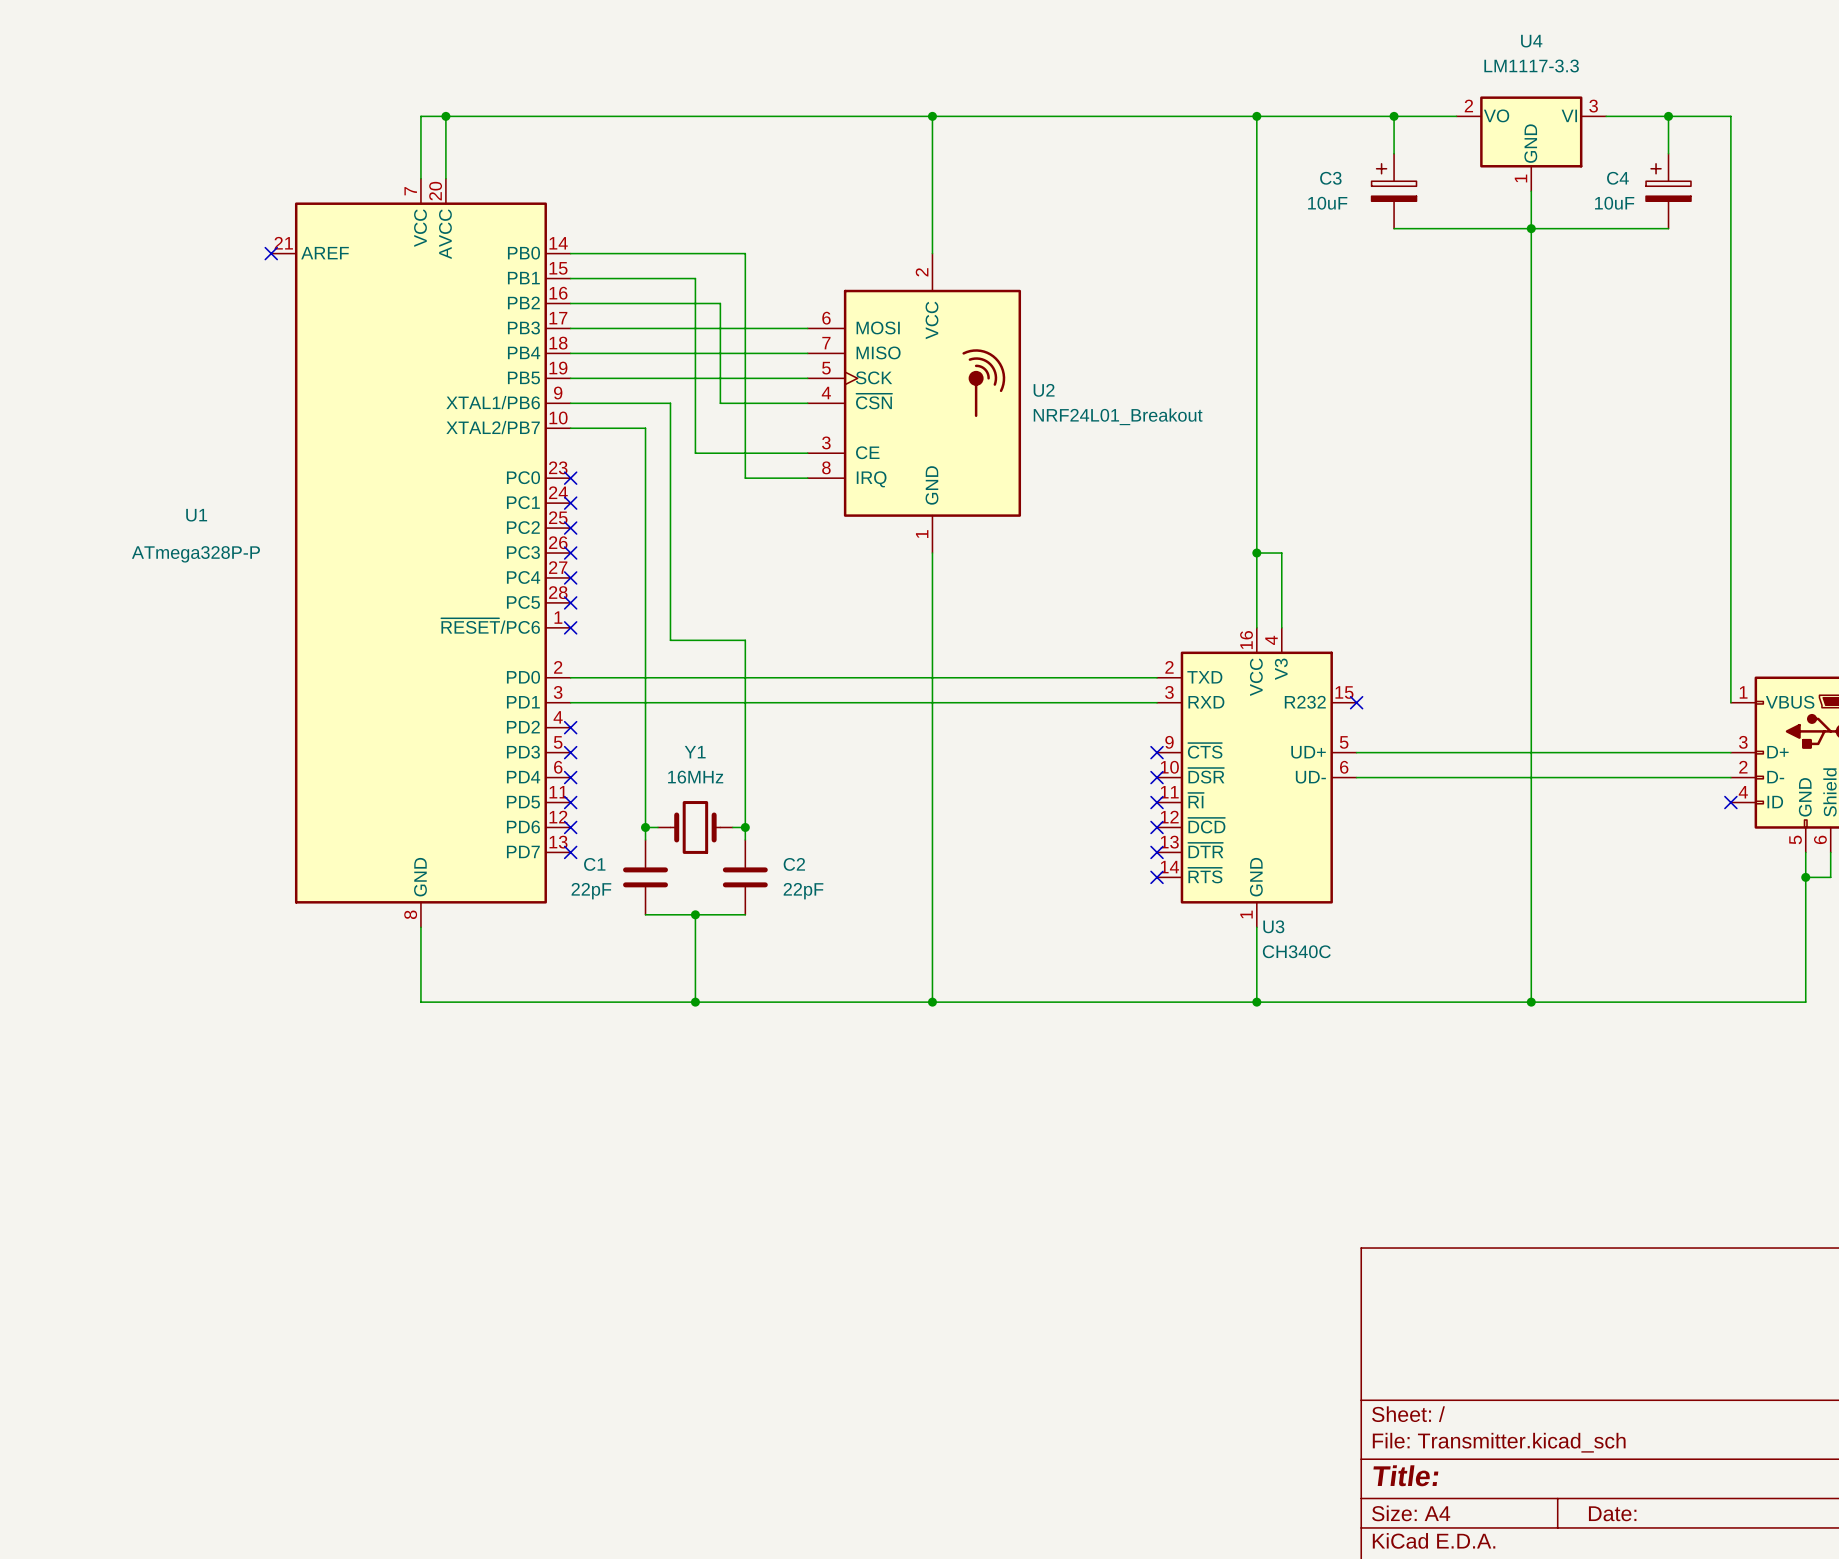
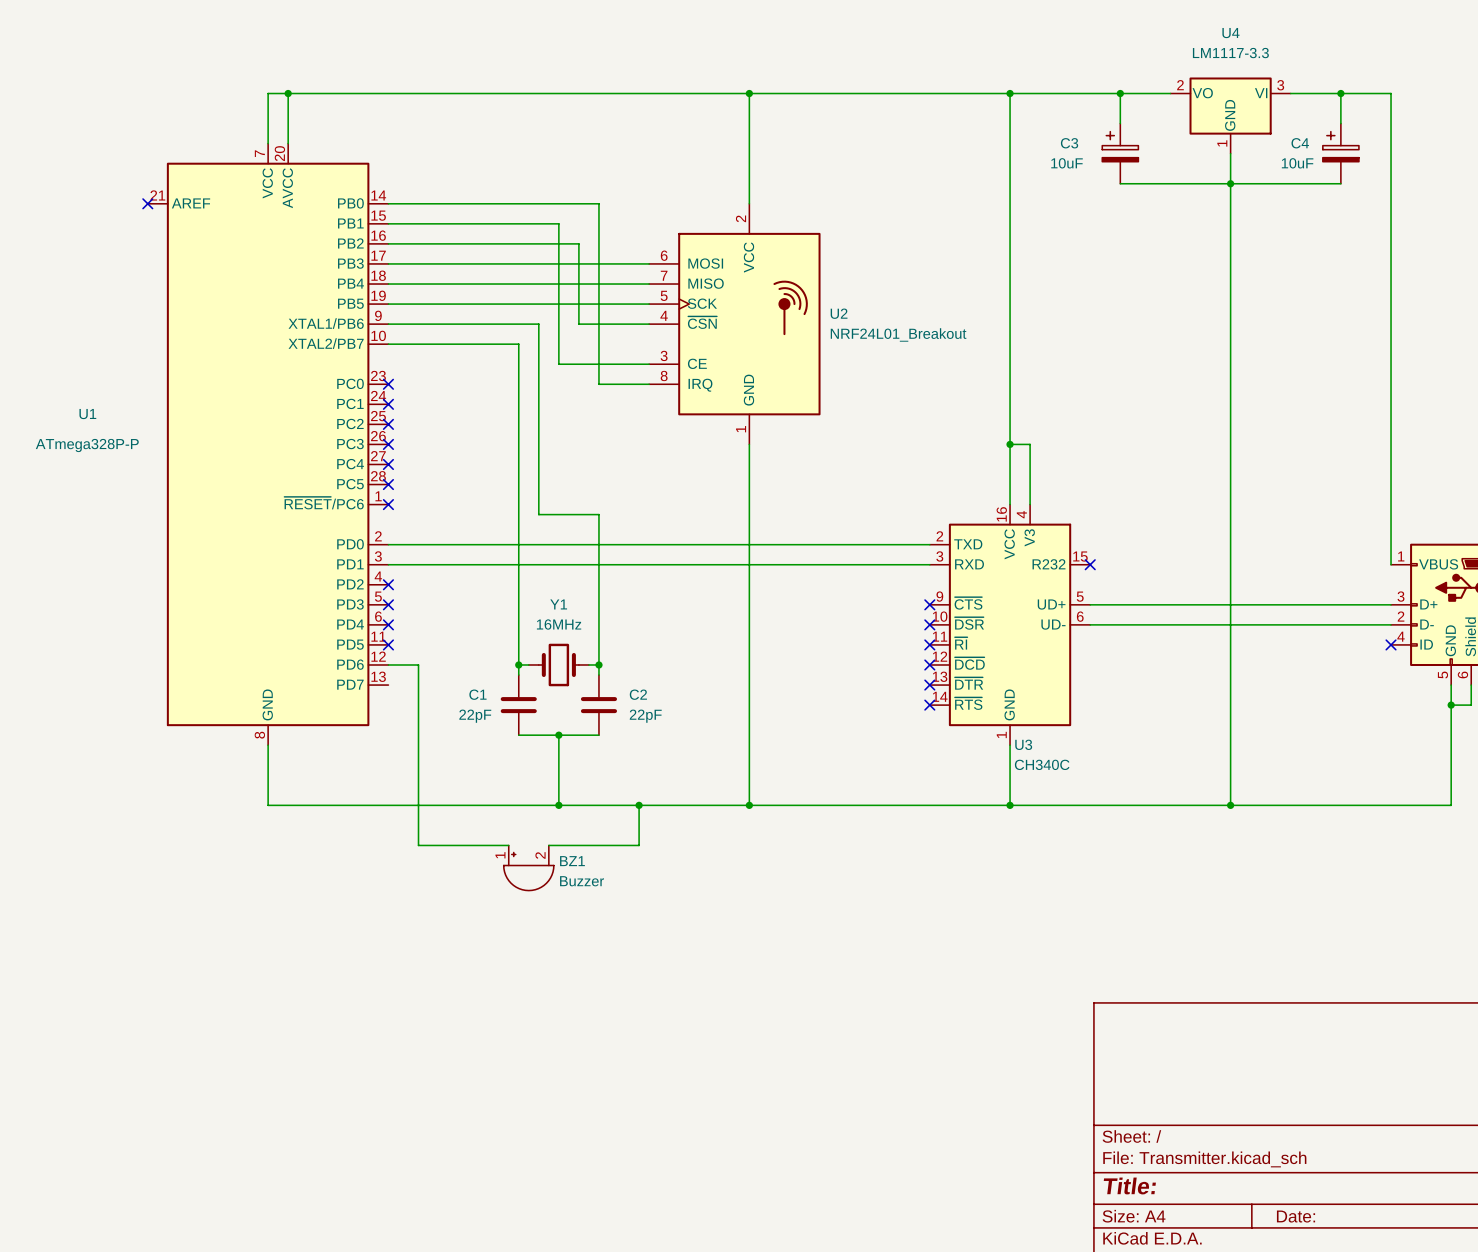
junction: none -> (288, 93)
wire: (420, 116) (420, 178) -> (338, 93) (268, 93) (268, 143)
wire: (445, 116) (445, 178) -> (288, 93) (288, 143)
junction: (445, 116) -> none
no-connect mark: none -> (147, 203)
no-connect mark: (271, 253) -> none
no-connect mark: none -> (388, 384)
no-connect mark: (570, 478) -> none
no-connect mark: none -> (388, 404)
no-connect mark: (570, 503) -> none
no-connect mark: none -> (388, 424)
no-connect mark: (570, 528) -> none
U1 position: (420, 553) -> (268, 444)
no-connect mark: none -> (388, 444)
no-connect mark: (570, 553) -> none
no-connect mark: none -> (388, 464)
no-connect mark: (570, 577) -> none
no-connect mark: none -> (388, 484)
no-connect mark: (570, 602) -> none
no-connect mark: none -> (388, 504)
no-connect mark: (570, 627) -> none
no-connect mark: none -> (388, 584)
no-connect mark: (570, 727) -> none
no-connect mark: none -> (388, 604)
no-connect mark: (570, 752) -> none
no-connect mark: none -> (388, 624)
no-connect mark: (570, 777) -> none
no-connect mark: none -> (388, 644)
no-connect mark: (570, 802) -> none
wire: none -> (388, 664) (418, 664) (418, 845) (508, 845)
no-connect mark: (570, 827) -> none
no-connect mark: (570, 852) -> none
wire: (420, 927) (420, 1002) -> (268, 745) (268, 805) (338, 805)
wire: none -> (639, 805) (639, 845) (548, 845)
junction: none -> (639, 805)
BZ1: none -> Buzzer (528, 868)

